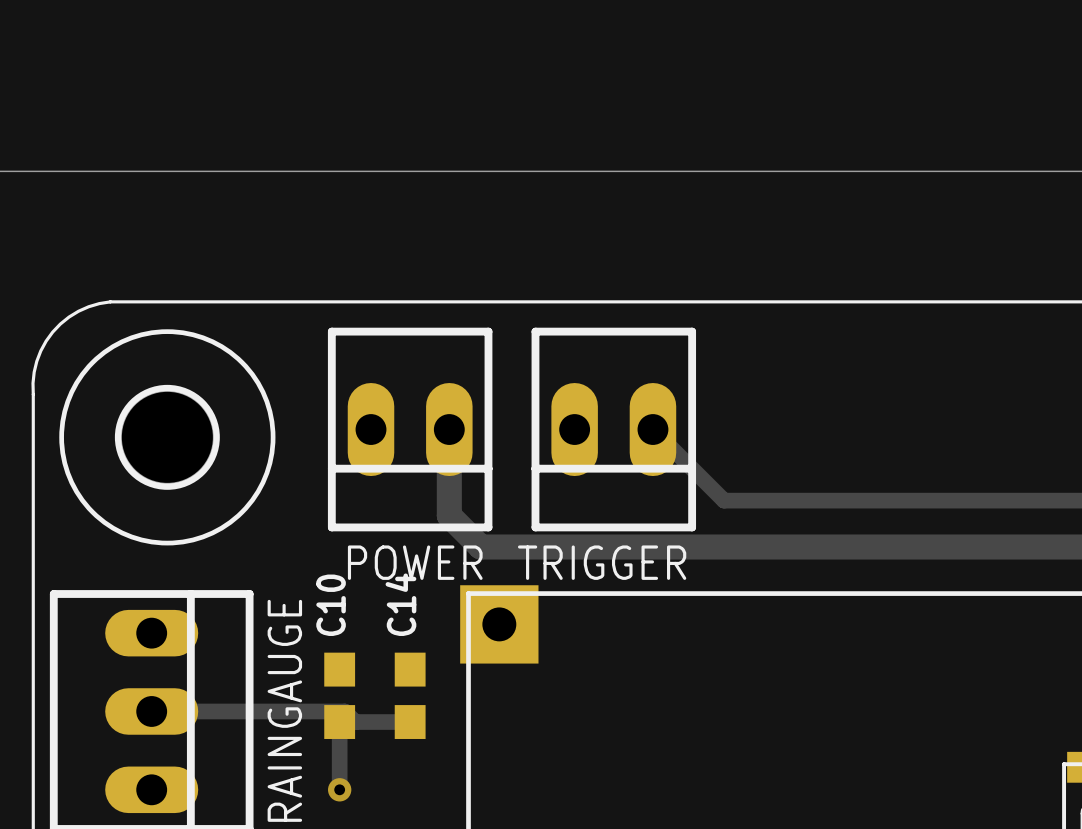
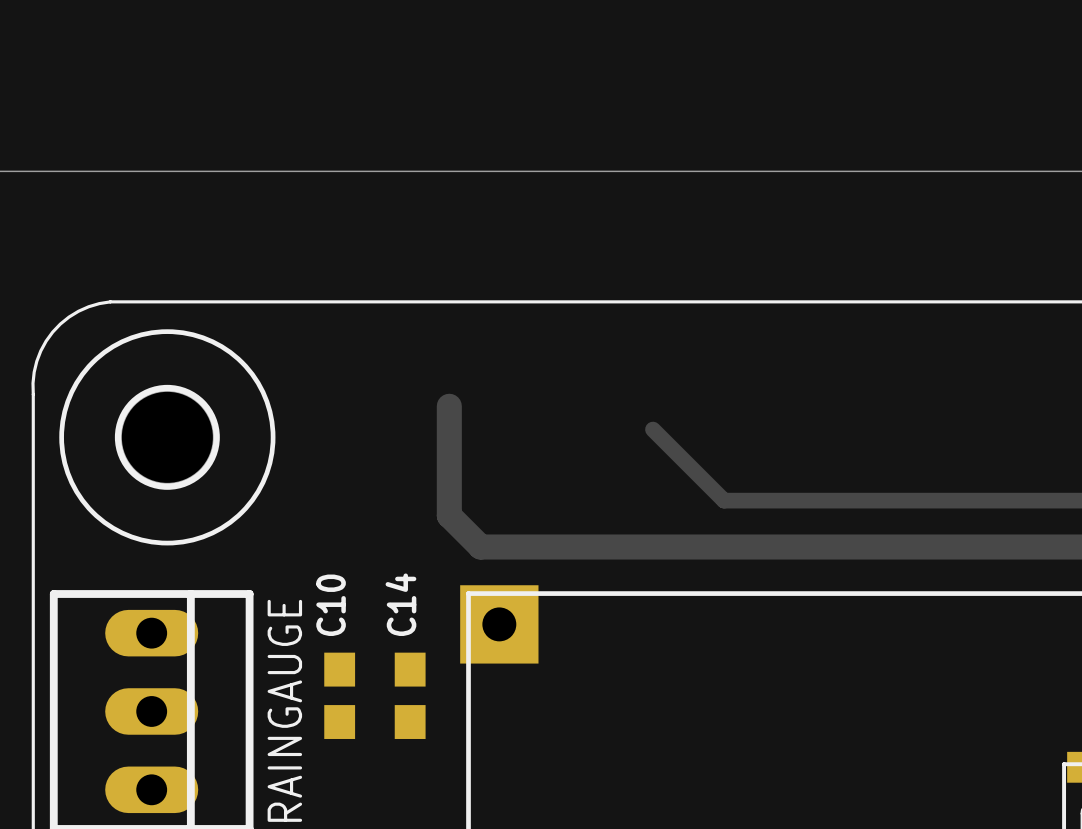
POWER: (410, 429) -> none
TRIGGER: (613, 429) -> none
track: (151, 711) (344, 711) (355, 722) -> none
track: (410, 722) (339, 722) (339, 789) -> none
via: (339, 789) -> none

